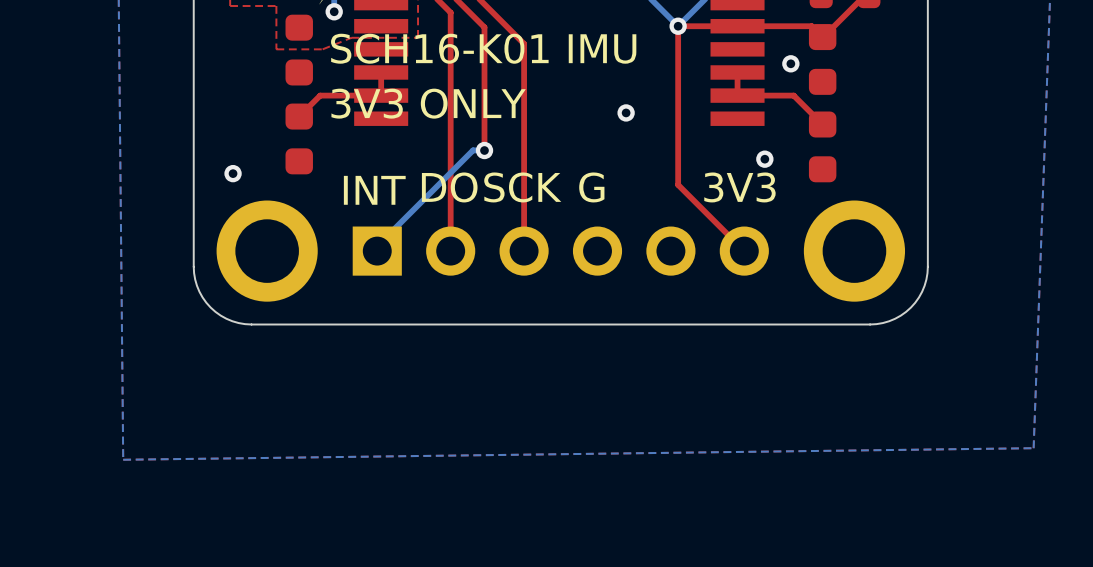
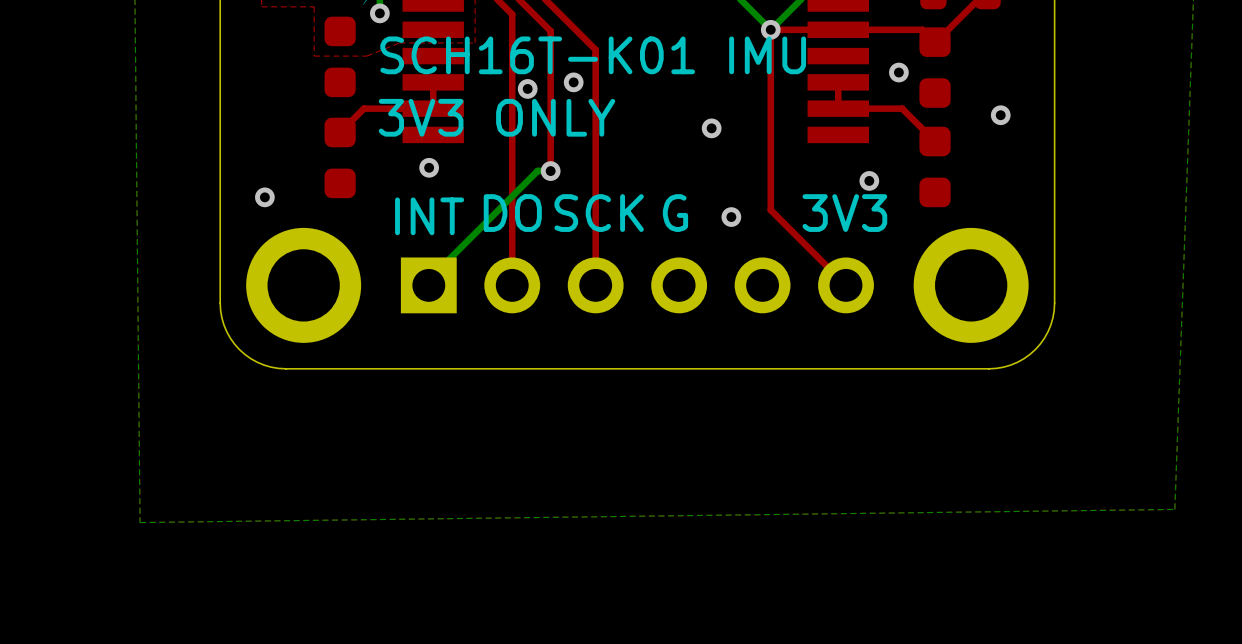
text: SCH16-K01 IMU (483, 48) -> SCH16T-K01 IMU (593, 55)
via: none -> (573, 82)
via: none -> (527, 88)
via: none -> (1000, 115)
via: none -> (429, 167)
via: none -> (731, 217)

